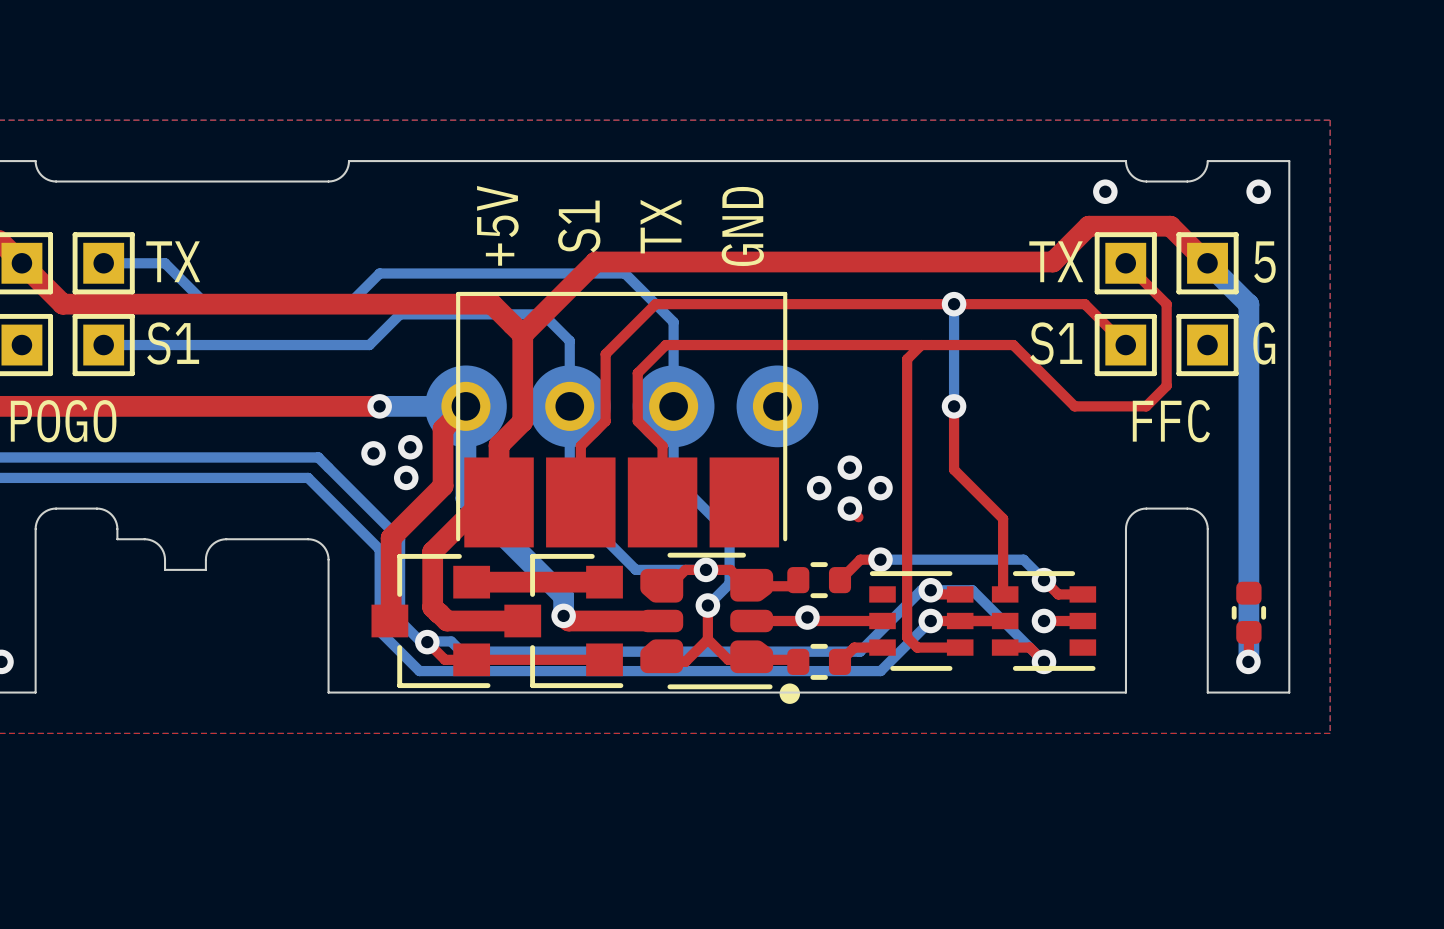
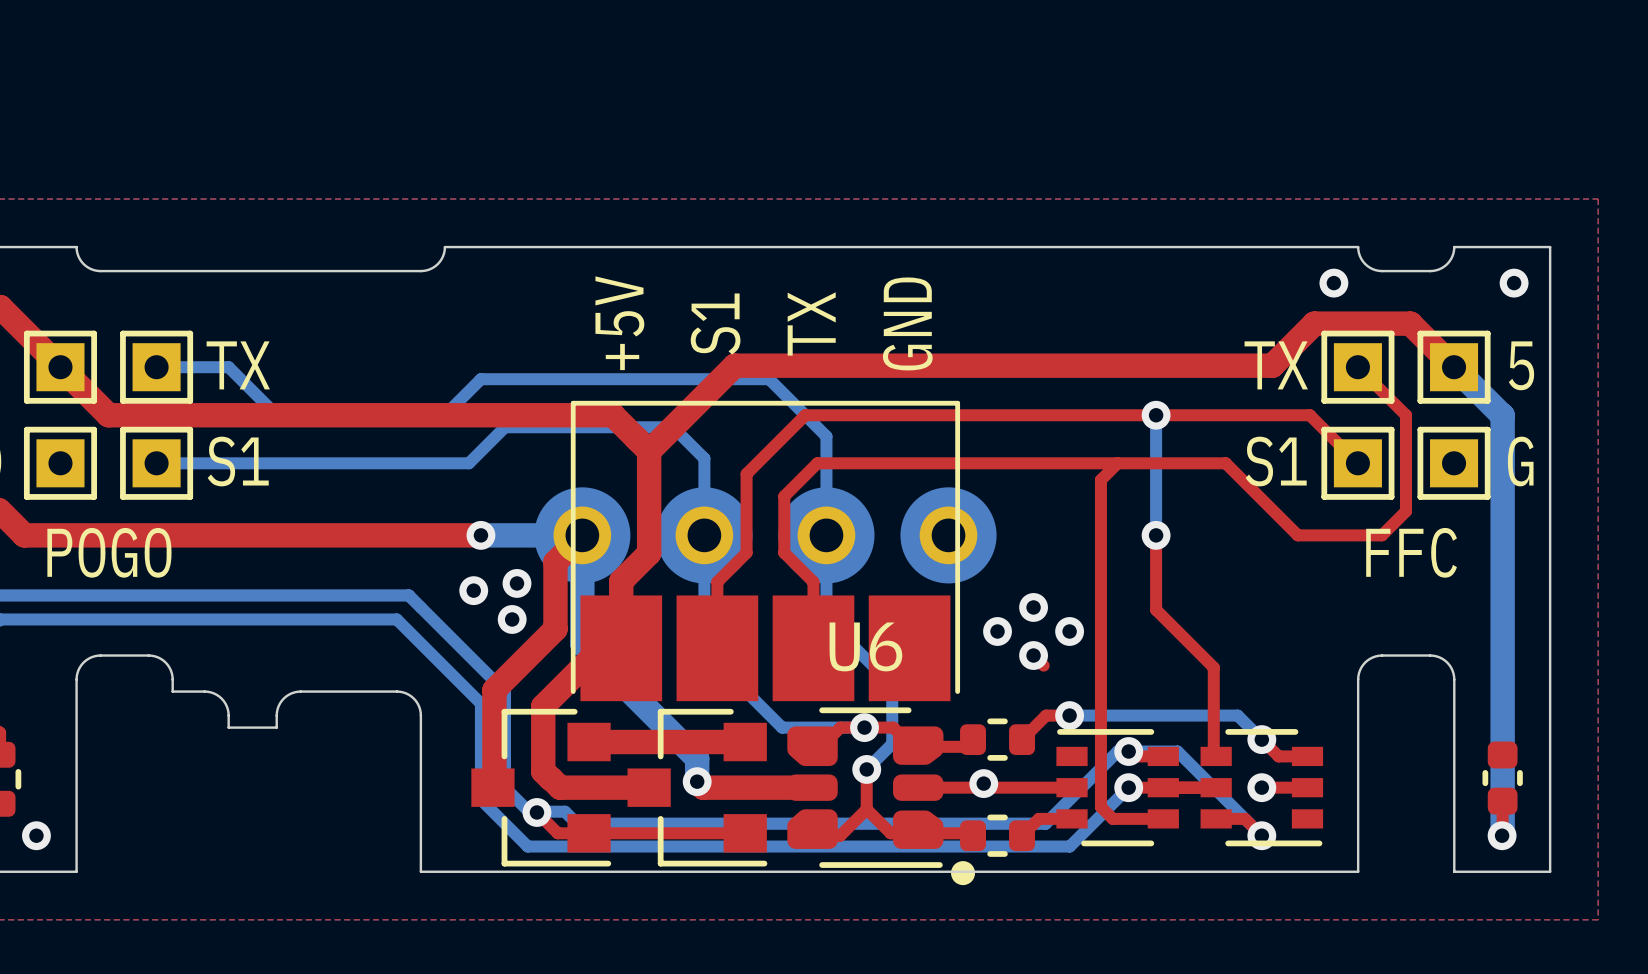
U6 name: none -> U6 (865, 646)

